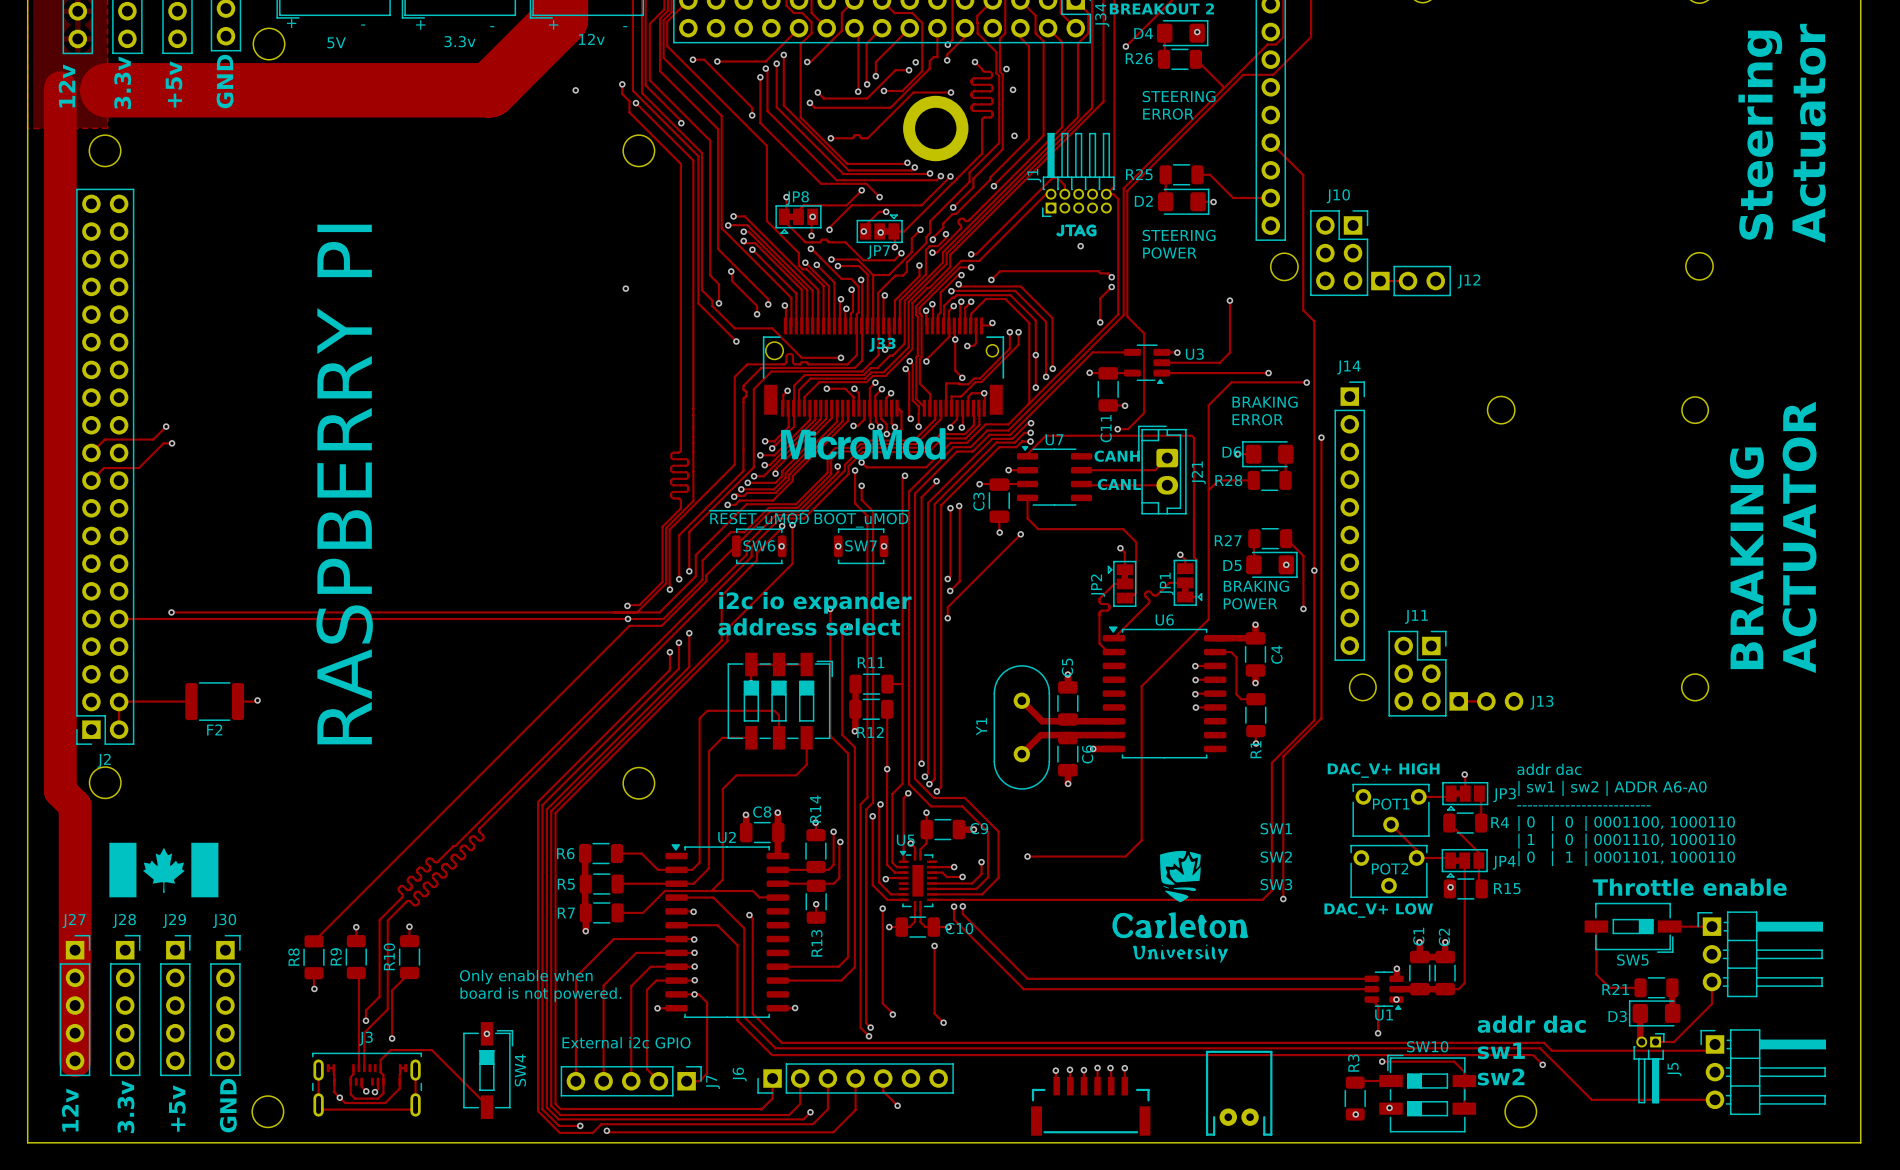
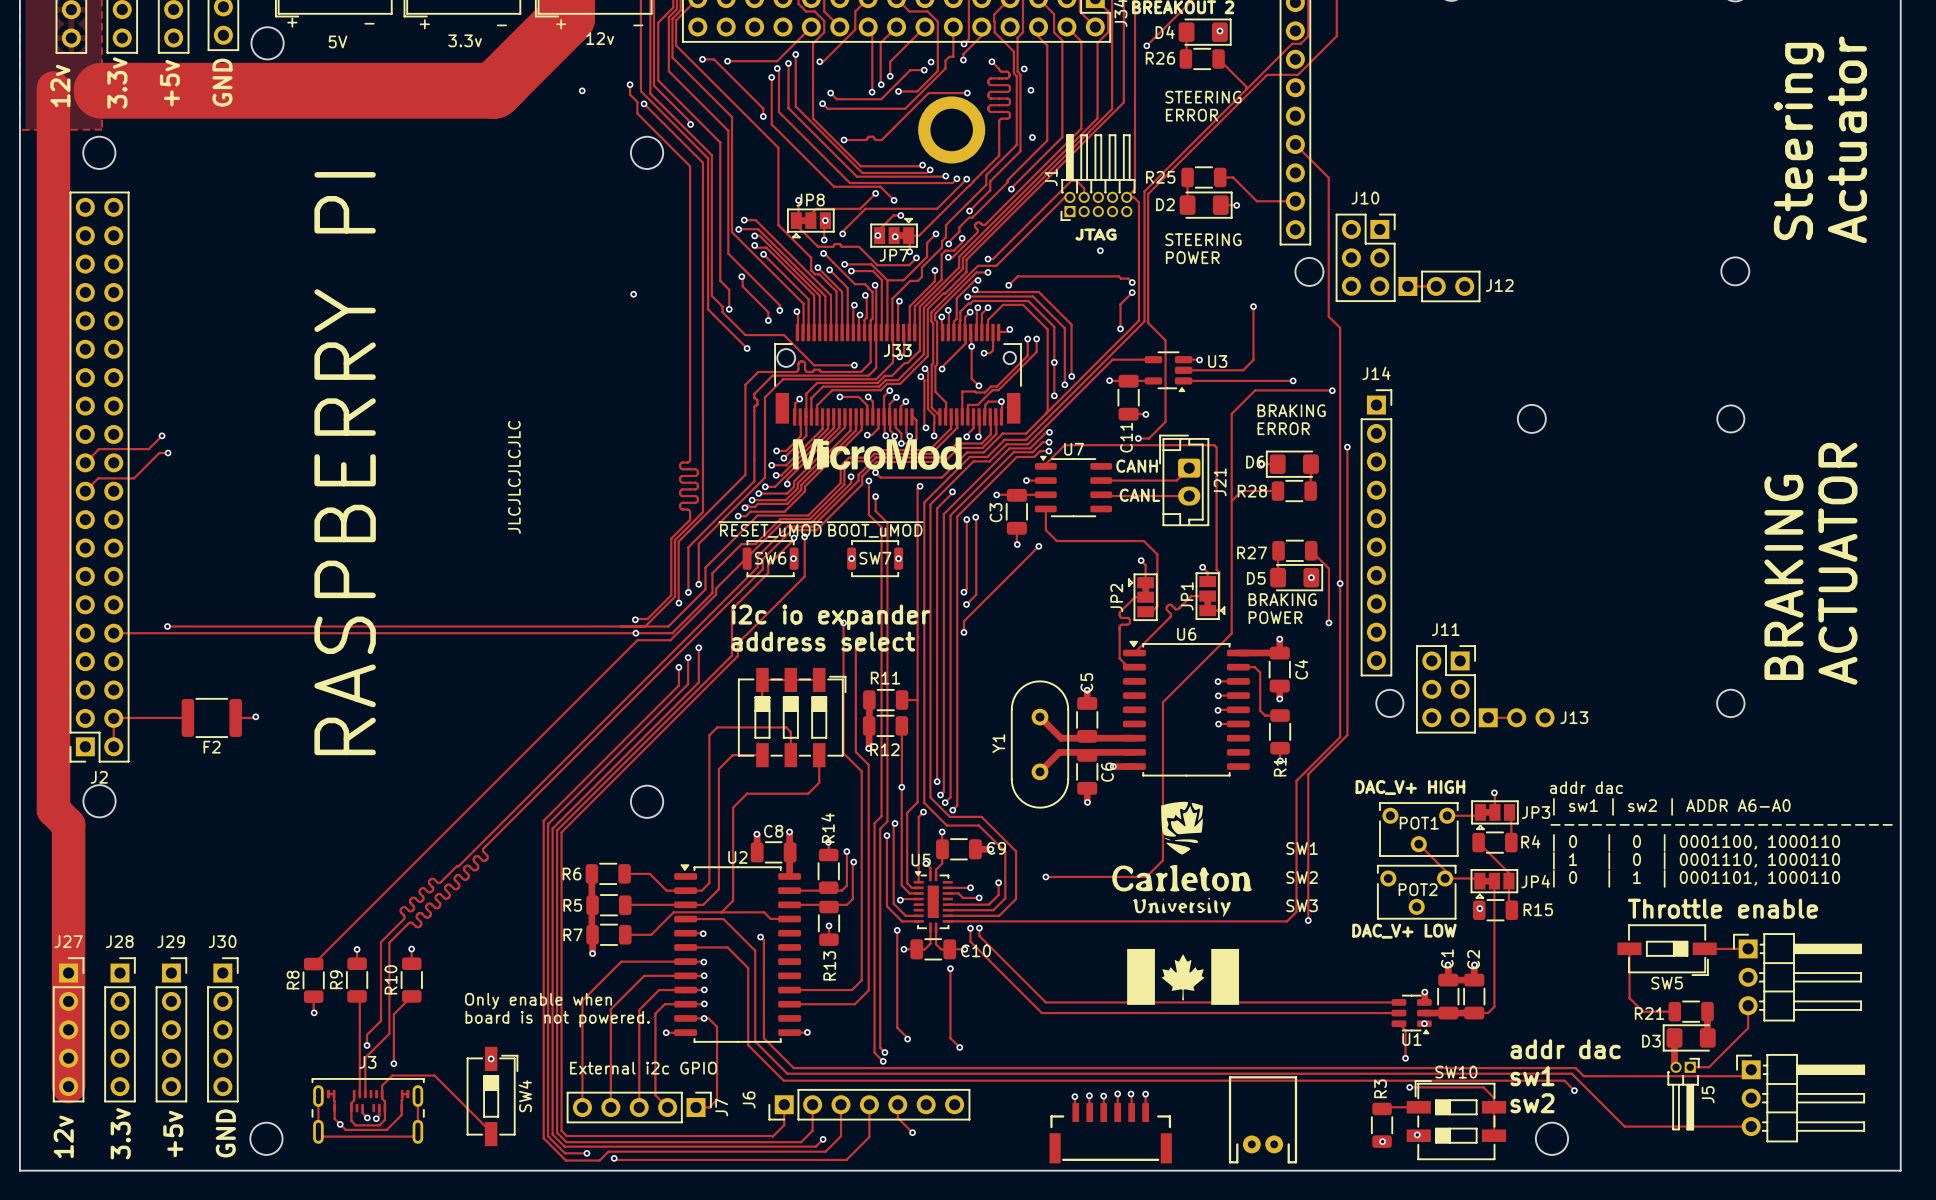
text: none -> JLCJLCJLCJLC (514, 477)
drawing: [109, 842, 219, 898] -> none
drawing position: (1180, 906) -> (1182, 859)
drawing: none -> [1127, 948, 1240, 1005]

